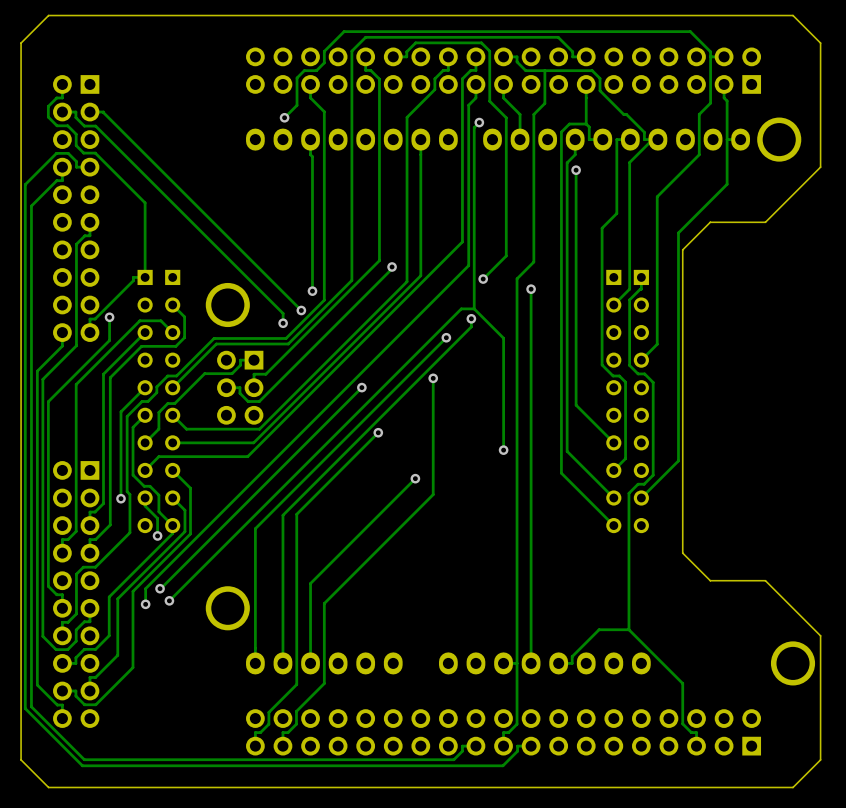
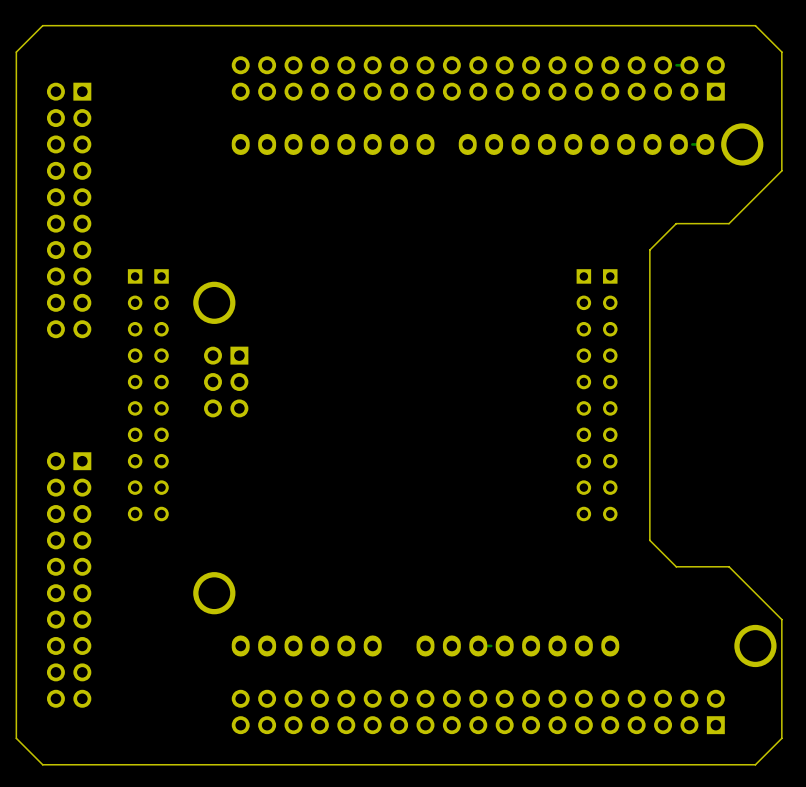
track: (365, 56) (365, 70) (370, 70) (379, 79) (379, 260) (265, 374) (254, 374) (254, 387) -> none
track: (393, 56) (406, 56) (406, 51) (415, 42) (481, 42) (489, 51) (489, 101) (506, 117) (506, 255) (483, 279) -> none
track: (448, 56) (448, 70) (443, 70) (434, 78) (434, 89) (407, 117) (407, 281) (259, 429) (186, 429) (172, 415) -> none
track: (475, 56) (475, 70) (470, 70) (462, 78) (462, 241) (247, 456) (158, 456) (145, 470) -> none
track: (503, 56) (517, 56) (517, 61) (525, 70) (592, 70) (600, 78) (600, 90) (644, 132) (644, 139) (657, 139) -> none
track: (586, 56) (572, 56) (572, 51) (558, 37) (365, 37) (351, 51) (351, 280) (288, 344) (216, 344) (172, 387) -> none
track: (544, 70) (544, 103) (533, 114) (533, 262) (517, 278) (517, 724) (508, 732) (503, 732) (503, 746) -> none
track: (62, 84) (62, 97) (56, 97) (48, 106) (48, 117) (57, 125) (67, 125) (76, 134) (76, 145) (83, 153) (95, 153) (145, 202) (145, 277) (133, 277) (133, 280) (95, 319) (89, 319) (89, 332) -> none
track: (310, 84) (310, 97) (324, 111) (324, 300) (286, 338) (214, 338) (176, 376) (167, 376) (156, 386) (156, 392) (147, 401) (142, 401) (127, 416) (127, 491) (129, 494) (129, 532) (95, 567) (83, 567) (76, 574) (76, 613) (68, 622) (62, 622) (62, 635) -> none
track: (475, 84) (475, 97) (468, 105) (468, 265) (145, 588) (145, 604) -> none
track: (503, 84) (503, 97) (520, 114) (520, 139) -> none
track: (586, 84) (586, 124) -> none
track: (724, 84) (724, 97) (727, 100) (727, 184) (678, 232) (678, 460) (641, 498) -> none
track: (62, 112) (75, 112) (75, 117) (84, 126) (95, 126) (283, 313) (283, 323) -> none
track: (89, 112) (103, 112) (301, 310) -> none
track: (284, 117) (297, 105) (297, 77) (304, 70) (316, 70) (324, 62) (324, 51) (344, 31) (690, 31) (710, 51) (710, 103) (699, 114) (699, 154) (657, 196) (657, 344) (641, 360) -> none
via: (284, 117) -> none
track: (479, 122) (474, 127) (474, 308) -> none
via: (479, 122) -> none
track: (586, 124) (569, 124) (561, 132) (561, 473) (613, 525) -> none
track: (586, 124) (589, 127) (589, 139) (602, 139) -> none
track: (310, 139) (310, 154) (312, 156) (312, 291) -> none
track: (420, 139) (420, 275) (253, 442) (172, 442) -> none
track: (575, 139) (575, 154) (567, 162) (567, 451) (613, 498) -> none
track: (630, 139) (616, 139) (616, 213) (602, 228) (602, 365) (613, 376) (619, 376) (625, 382) (625, 458) (613, 470) -> none
track: (652, 139) (629, 162) (629, 289) (613, 305) -> none
track: (62, 167) (62, 180) (56, 180) (31, 206) (31, 706) (84, 759) (453, 759) (462, 751) (462, 746) (475, 746) -> none
track: (89, 167) (76, 167) (76, 161) (68, 153) (56, 153) (25, 184) (25, 708) (82, 765) (502, 765) (517, 751) (517, 746) (531, 746) -> none
track: (576, 170) (576, 405) (613, 442) -> none
via: (576, 170) -> none
track: (89, 222) (89, 235) (84, 235) (76, 244) (76, 345) (42, 379) (42, 636) (56, 649) (67, 649) (76, 641) (76, 629) (84, 621) (89, 621) (89, 608) -> none
track: (392, 266) (259, 401) (248, 401) (239, 393) (239, 387) (226, 387) -> none
via: (392, 266) -> none
track: (641, 277) (641, 289) (629, 299) (629, 365) (638, 373) (644, 373) (653, 382) (653, 475) (644, 484) (638, 484) (628, 493) (628, 629) -> none
via: (483, 279) -> none
track: (531, 289) (531, 663) -> none
via: (531, 289) -> none
via: (312, 291) -> none
track: (172, 305) (184, 316) (184, 337) (175, 346) (141, 346) (110, 377) (110, 524) (95, 539) (89, 539) (89, 553) -> none
track: (474, 308) (503, 338) (503, 450) -> none
track: (474, 308) (461, 308) (169, 600) -> none
via: (301, 310) -> none
track: (109, 317) (109, 340) (48, 401) (48, 586) (56, 594) (62, 594) (62, 608) -> none
via: (109, 317) -> none
track: (471, 318) (471, 326) (282, 515) (282, 663) -> none
via: (471, 318) -> none
via: (283, 323) -> none
track: (62, 332) (62, 346) (37, 371) (37, 685) (57, 705) (62, 705) (62, 718) -> none
track: (145, 332) (103, 374) (103, 503) (95, 512) (89, 512) (89, 525) -> none
track: (172, 332) (160, 320) (139, 320) (76, 384) (76, 531) (68, 539) (62, 539) (62, 553) -> none
track: (446, 337) (255, 528) (255, 663) -> none
via: (446, 337) -> none
track: (254, 360) (240, 360) (240, 365) (232, 373) (204, 373) (174, 403) (167, 403) (158, 412) (158, 429) (145, 442) -> none
track: (433, 378) (433, 494) (324, 603) (324, 683) (296, 711) (296, 724) (288, 732) (282, 732) (282, 746) -> none
via: (433, 378) -> none
track: (145, 387) (120, 411) (120, 498) -> none
track: (361, 387) (160, 588) -> none
via: (361, 387) -> none
track: (145, 415) (133, 427) (133, 475) (144, 486) (150, 486) (158, 495) (158, 511) (172, 525) (172, 533) (109, 596) (109, 635) (95, 649) (84, 649) (75, 657) (75, 663) (62, 663) -> none
track: (378, 432) (296, 514) (296, 684) (268, 712) (268, 724) (260, 732) (255, 732) (255, 746) -> none
via: (378, 432) -> none
via: (503, 450) -> none
track: (172, 470) (190, 488) (190, 533) (132, 591) (132, 667) (95, 704) (84, 704) (75, 696) (75, 690) (62, 690) -> none
track: (415, 478) (310, 583) (310, 663) -> none
via: (415, 478) -> none
via: (120, 498) -> none
track: (145, 498) (145, 506) (157, 518) (157, 535) -> none
track: (172, 498) (184, 510) (184, 531) (117, 598) (117, 655) (95, 677) (89, 677) (89, 690) -> none
via: (157, 535) -> none
via: (160, 588) -> none
via: (169, 600) -> none
via: (145, 604) -> none
track: (628, 629) (599, 629) (572, 656) (572, 663) (558, 663) -> none
track: (628, 629) (682, 683) (682, 723) (691, 732) (696, 732) (696, 746) -> none

